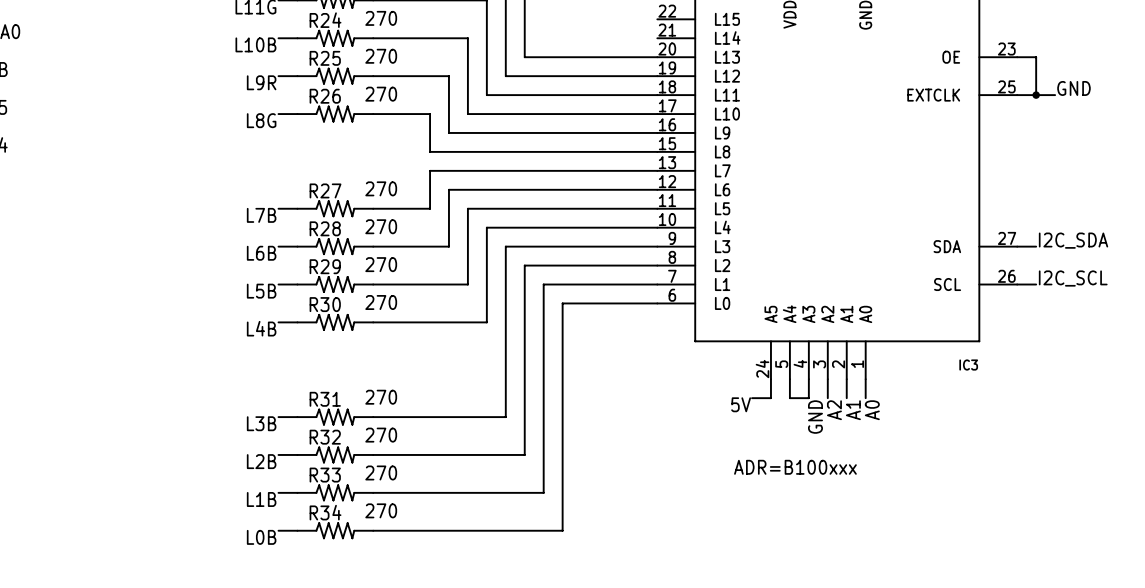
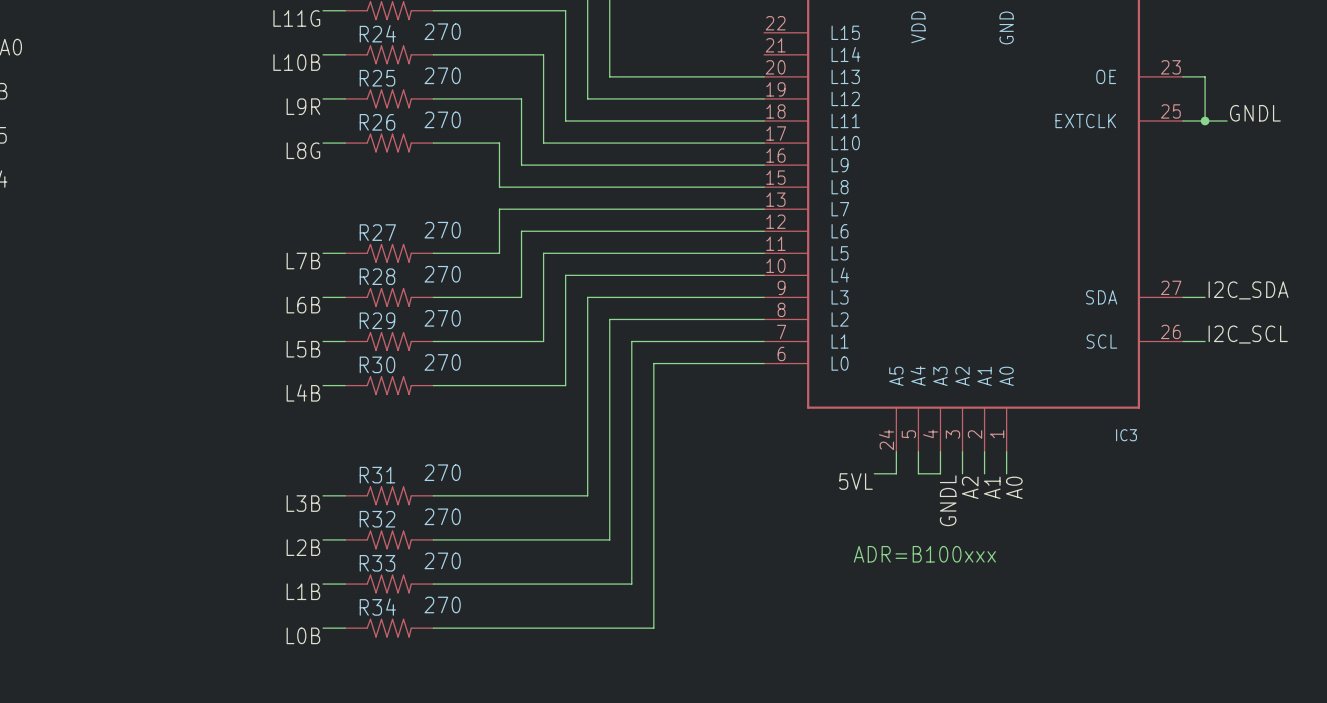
label: GND (1073, 88) -> GNDL (1255, 113)
label: 5V (741, 404) -> 5VL (855, 481)
label: GND (815, 417) -> GNDL (948, 500)

